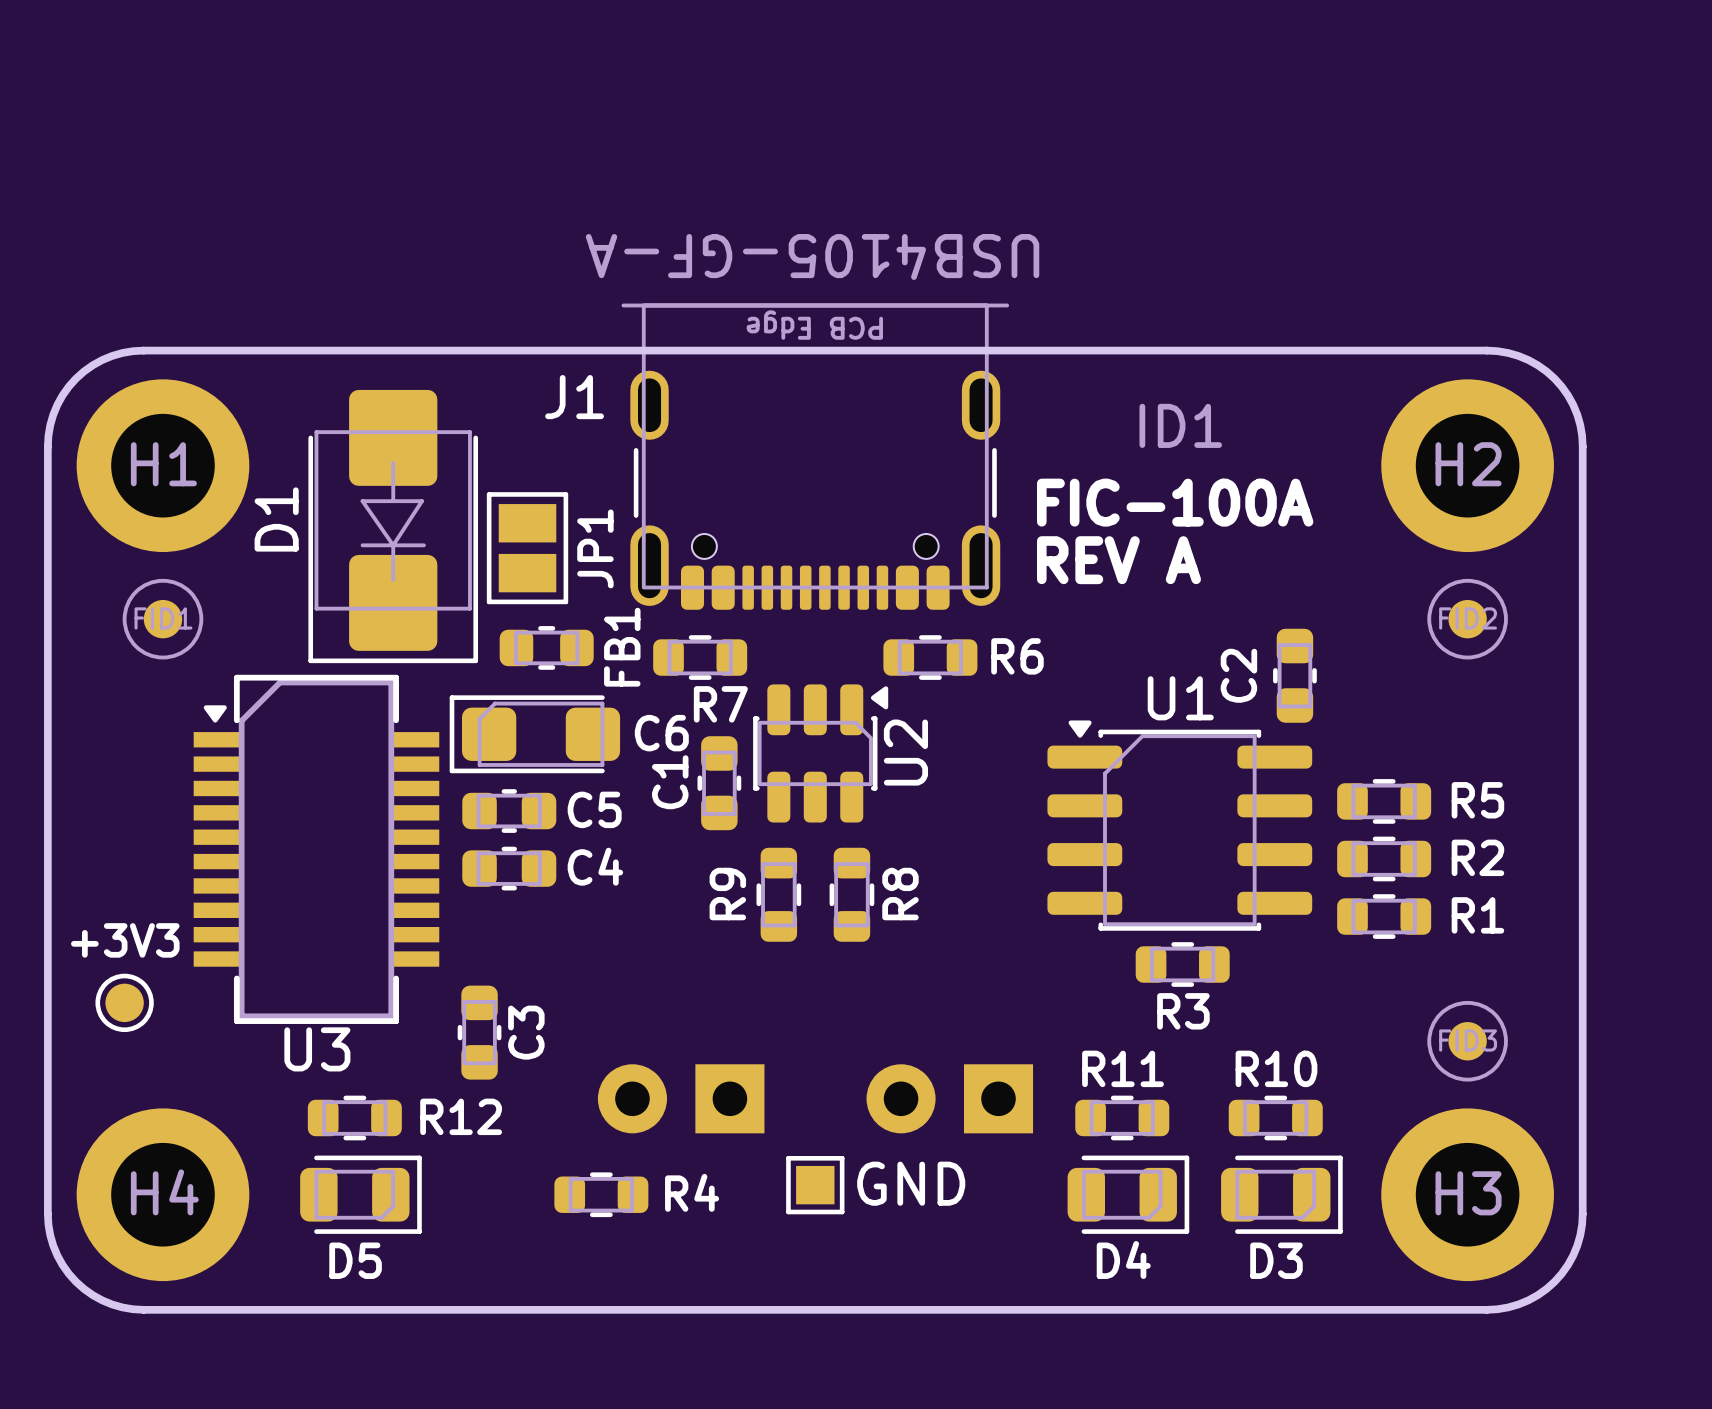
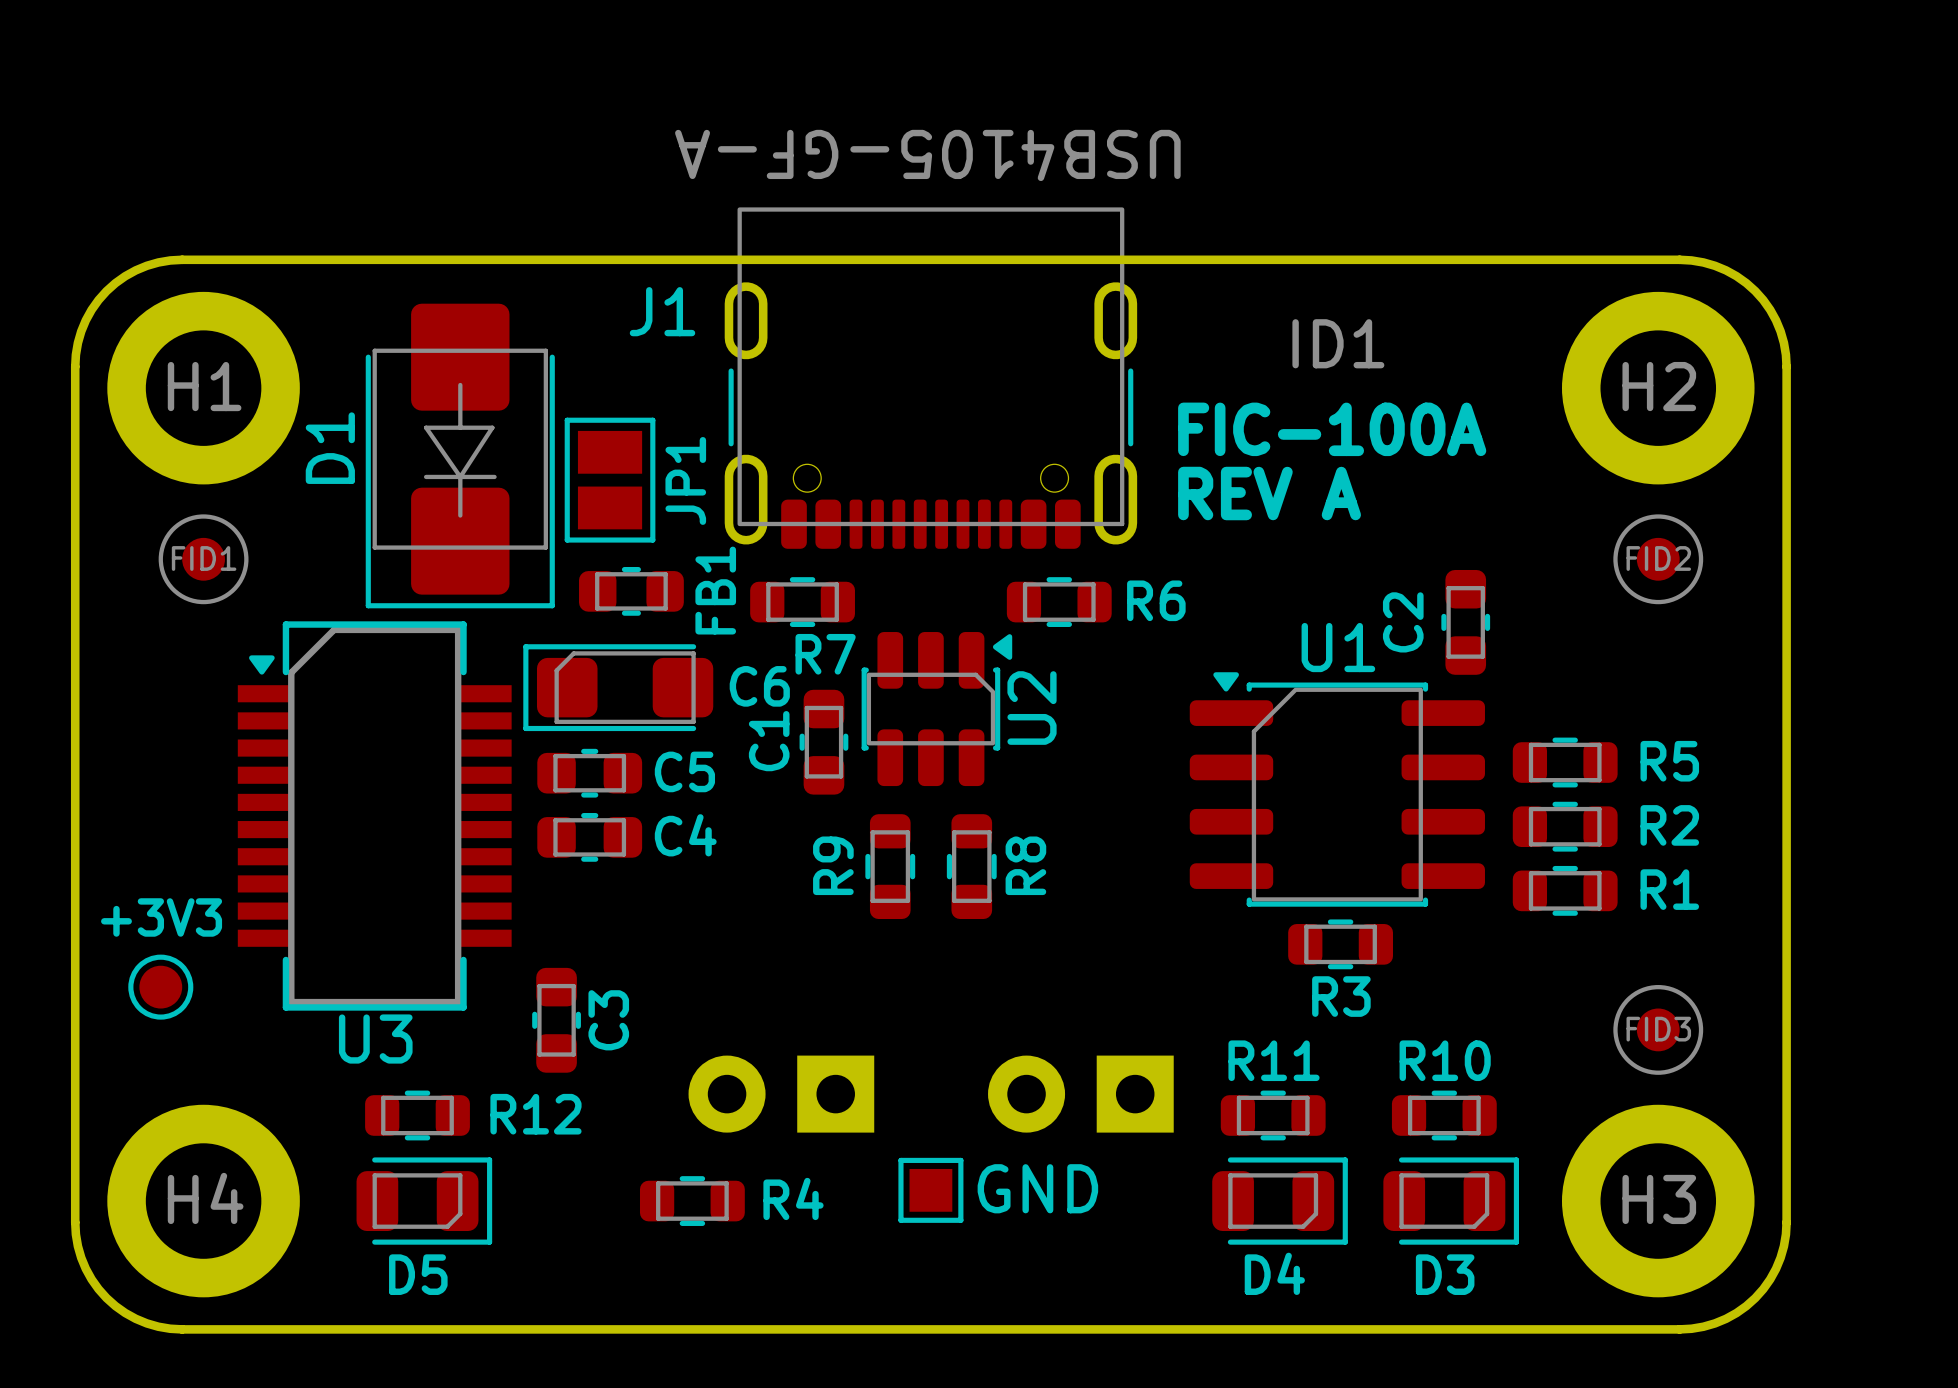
J1 footprint: [621, 303, 1010, 610] -> [724, 207, 1138, 549]
text: PCB Edge (814, 325) -> none

